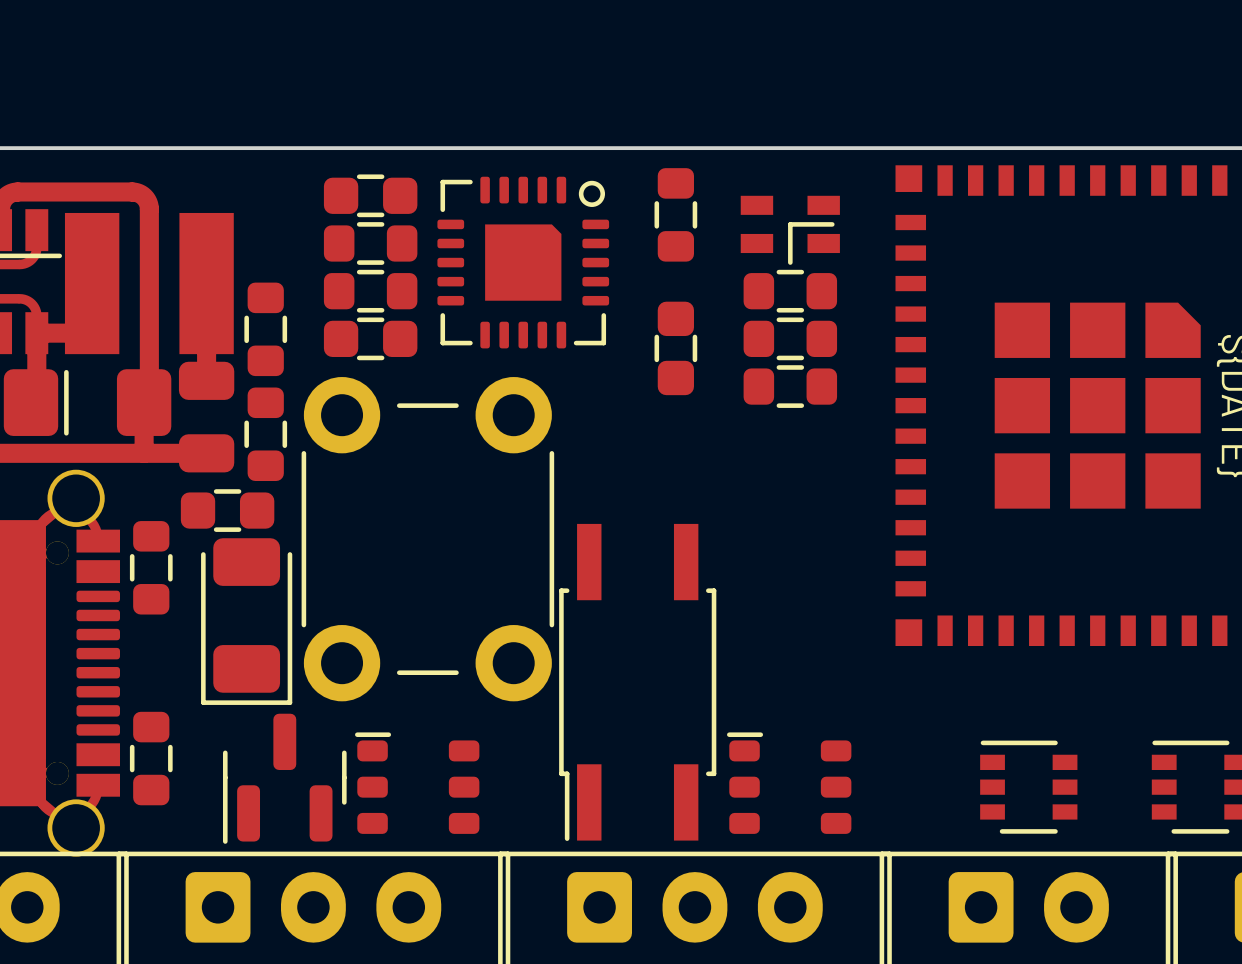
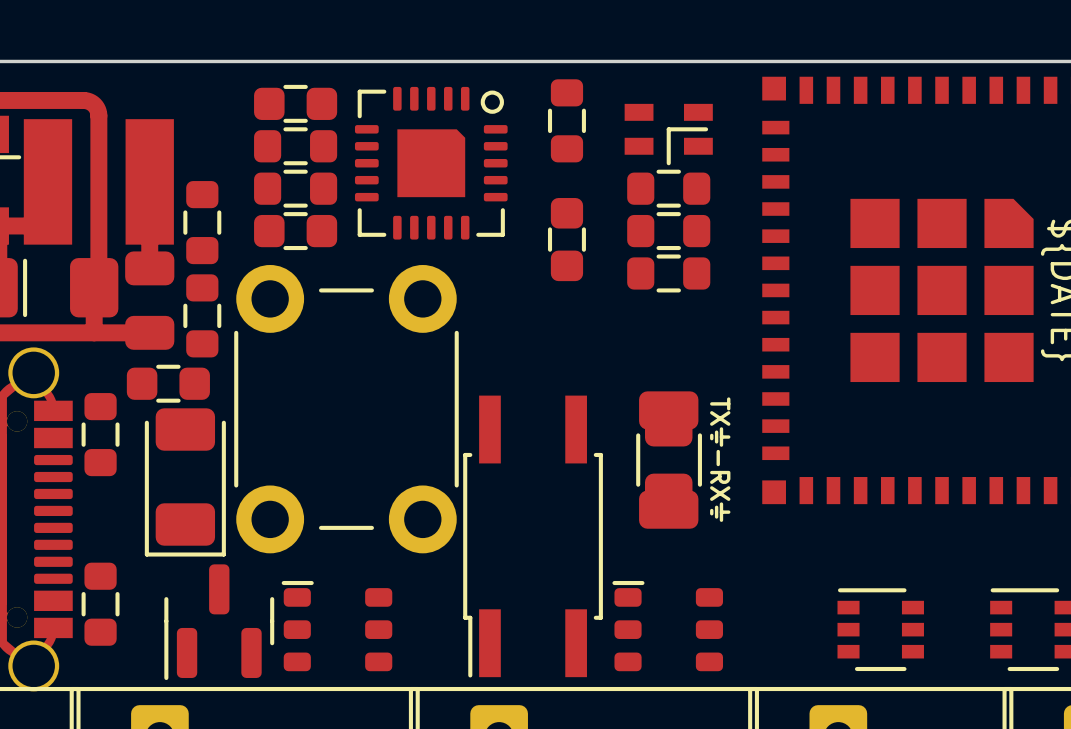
text: none -> TX⏚-RX⏚ (720, 459)
part: none -> (669, 460)

